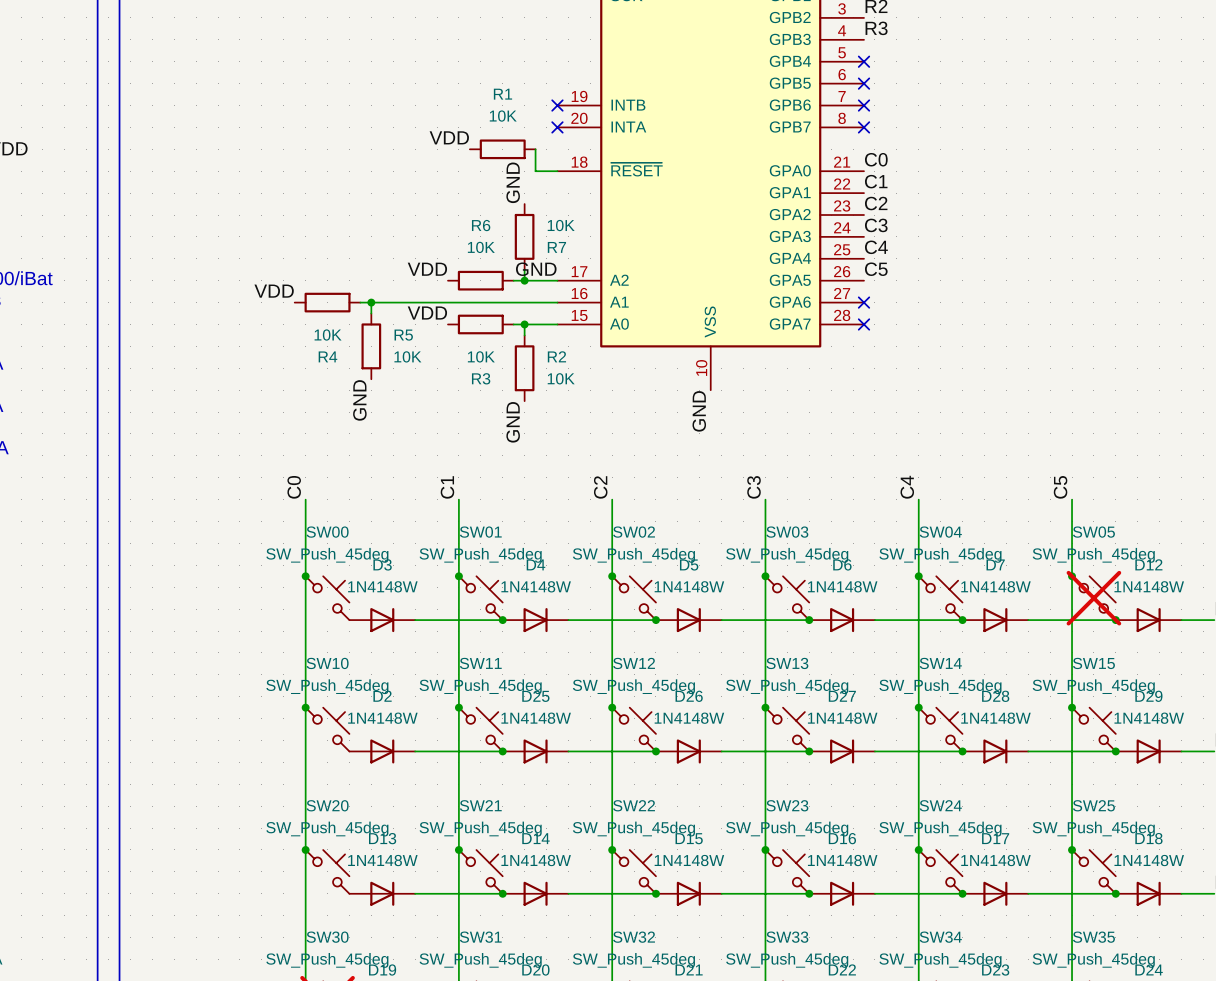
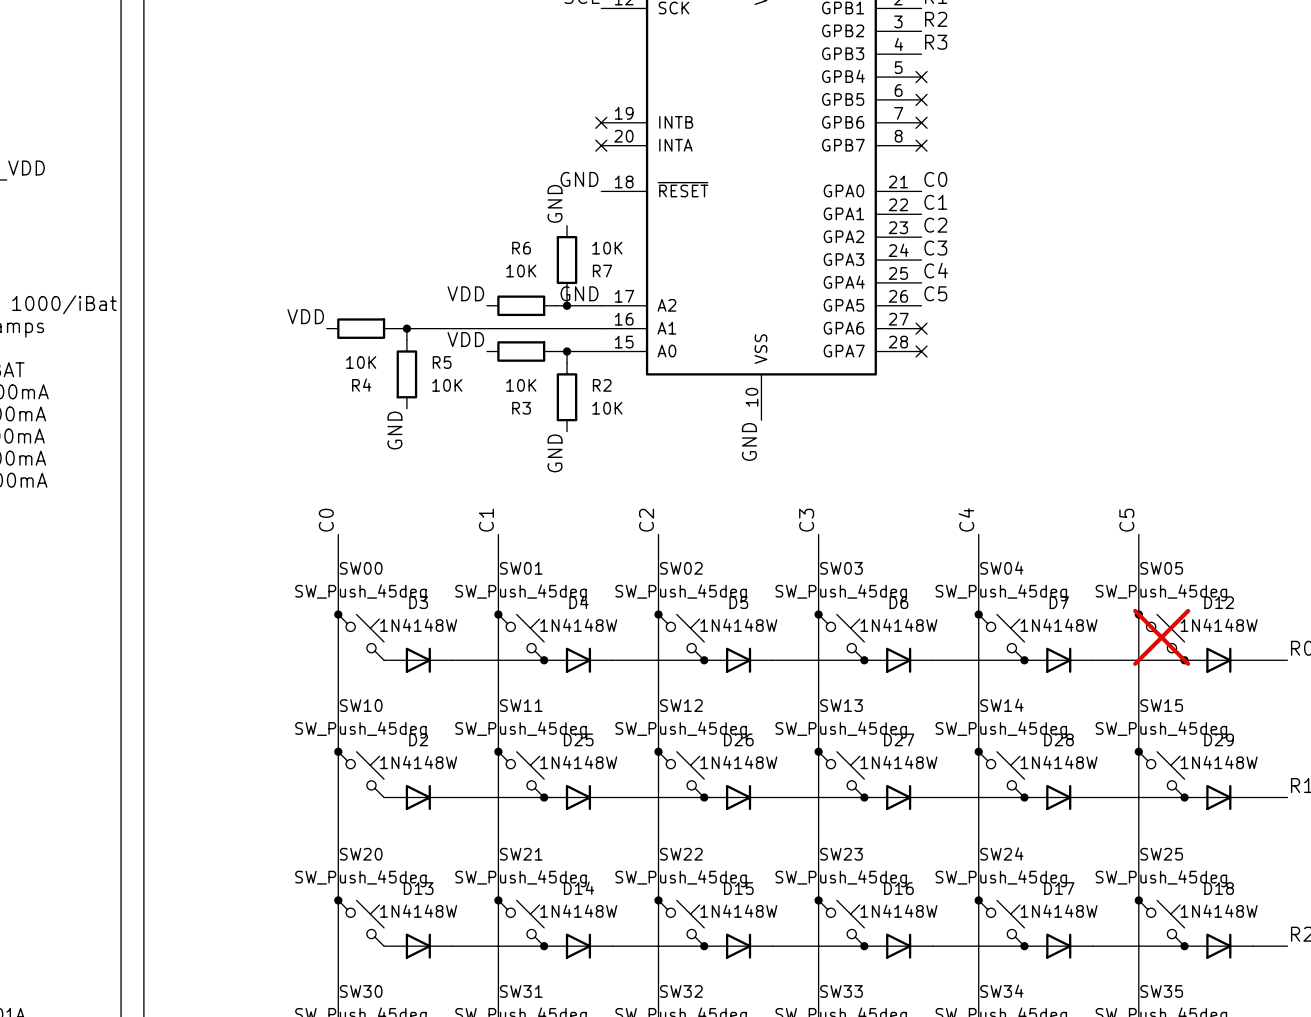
label: VDD (449, 137) -> none
R1: 10K (502, 149) -> none
wire: (535, 149) (535, 171) (557, 171) -> none
label: none -> GND (579, 179)

